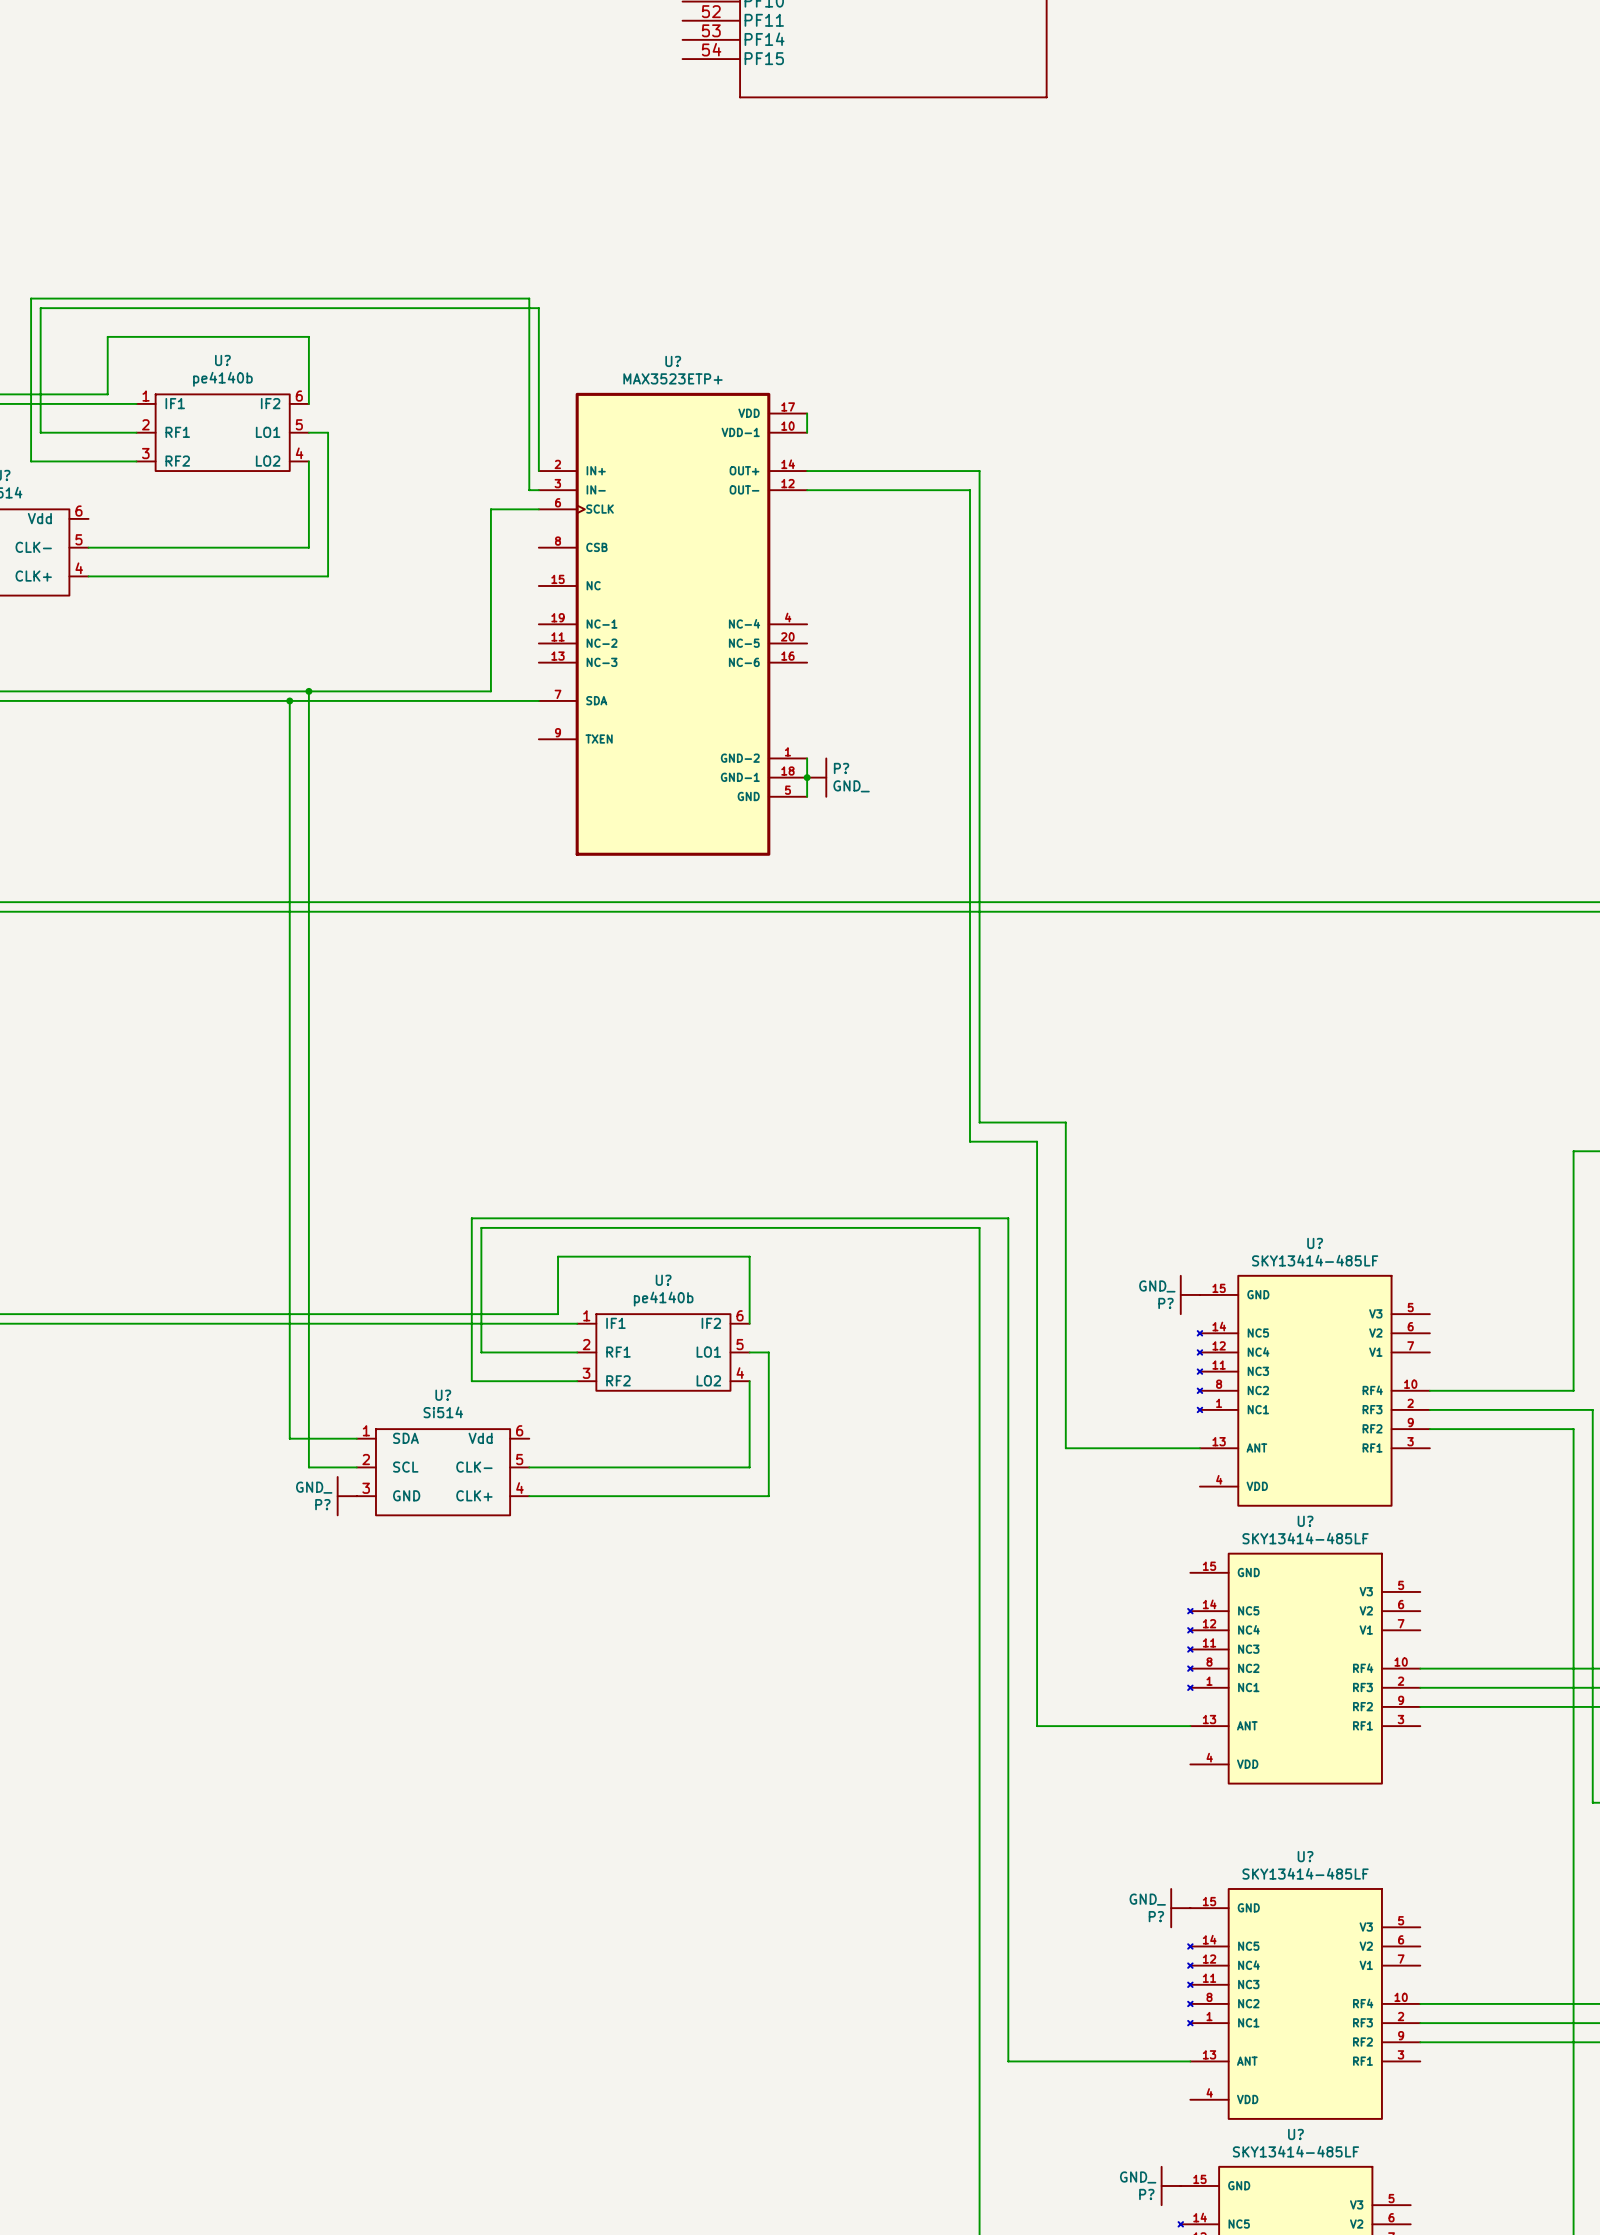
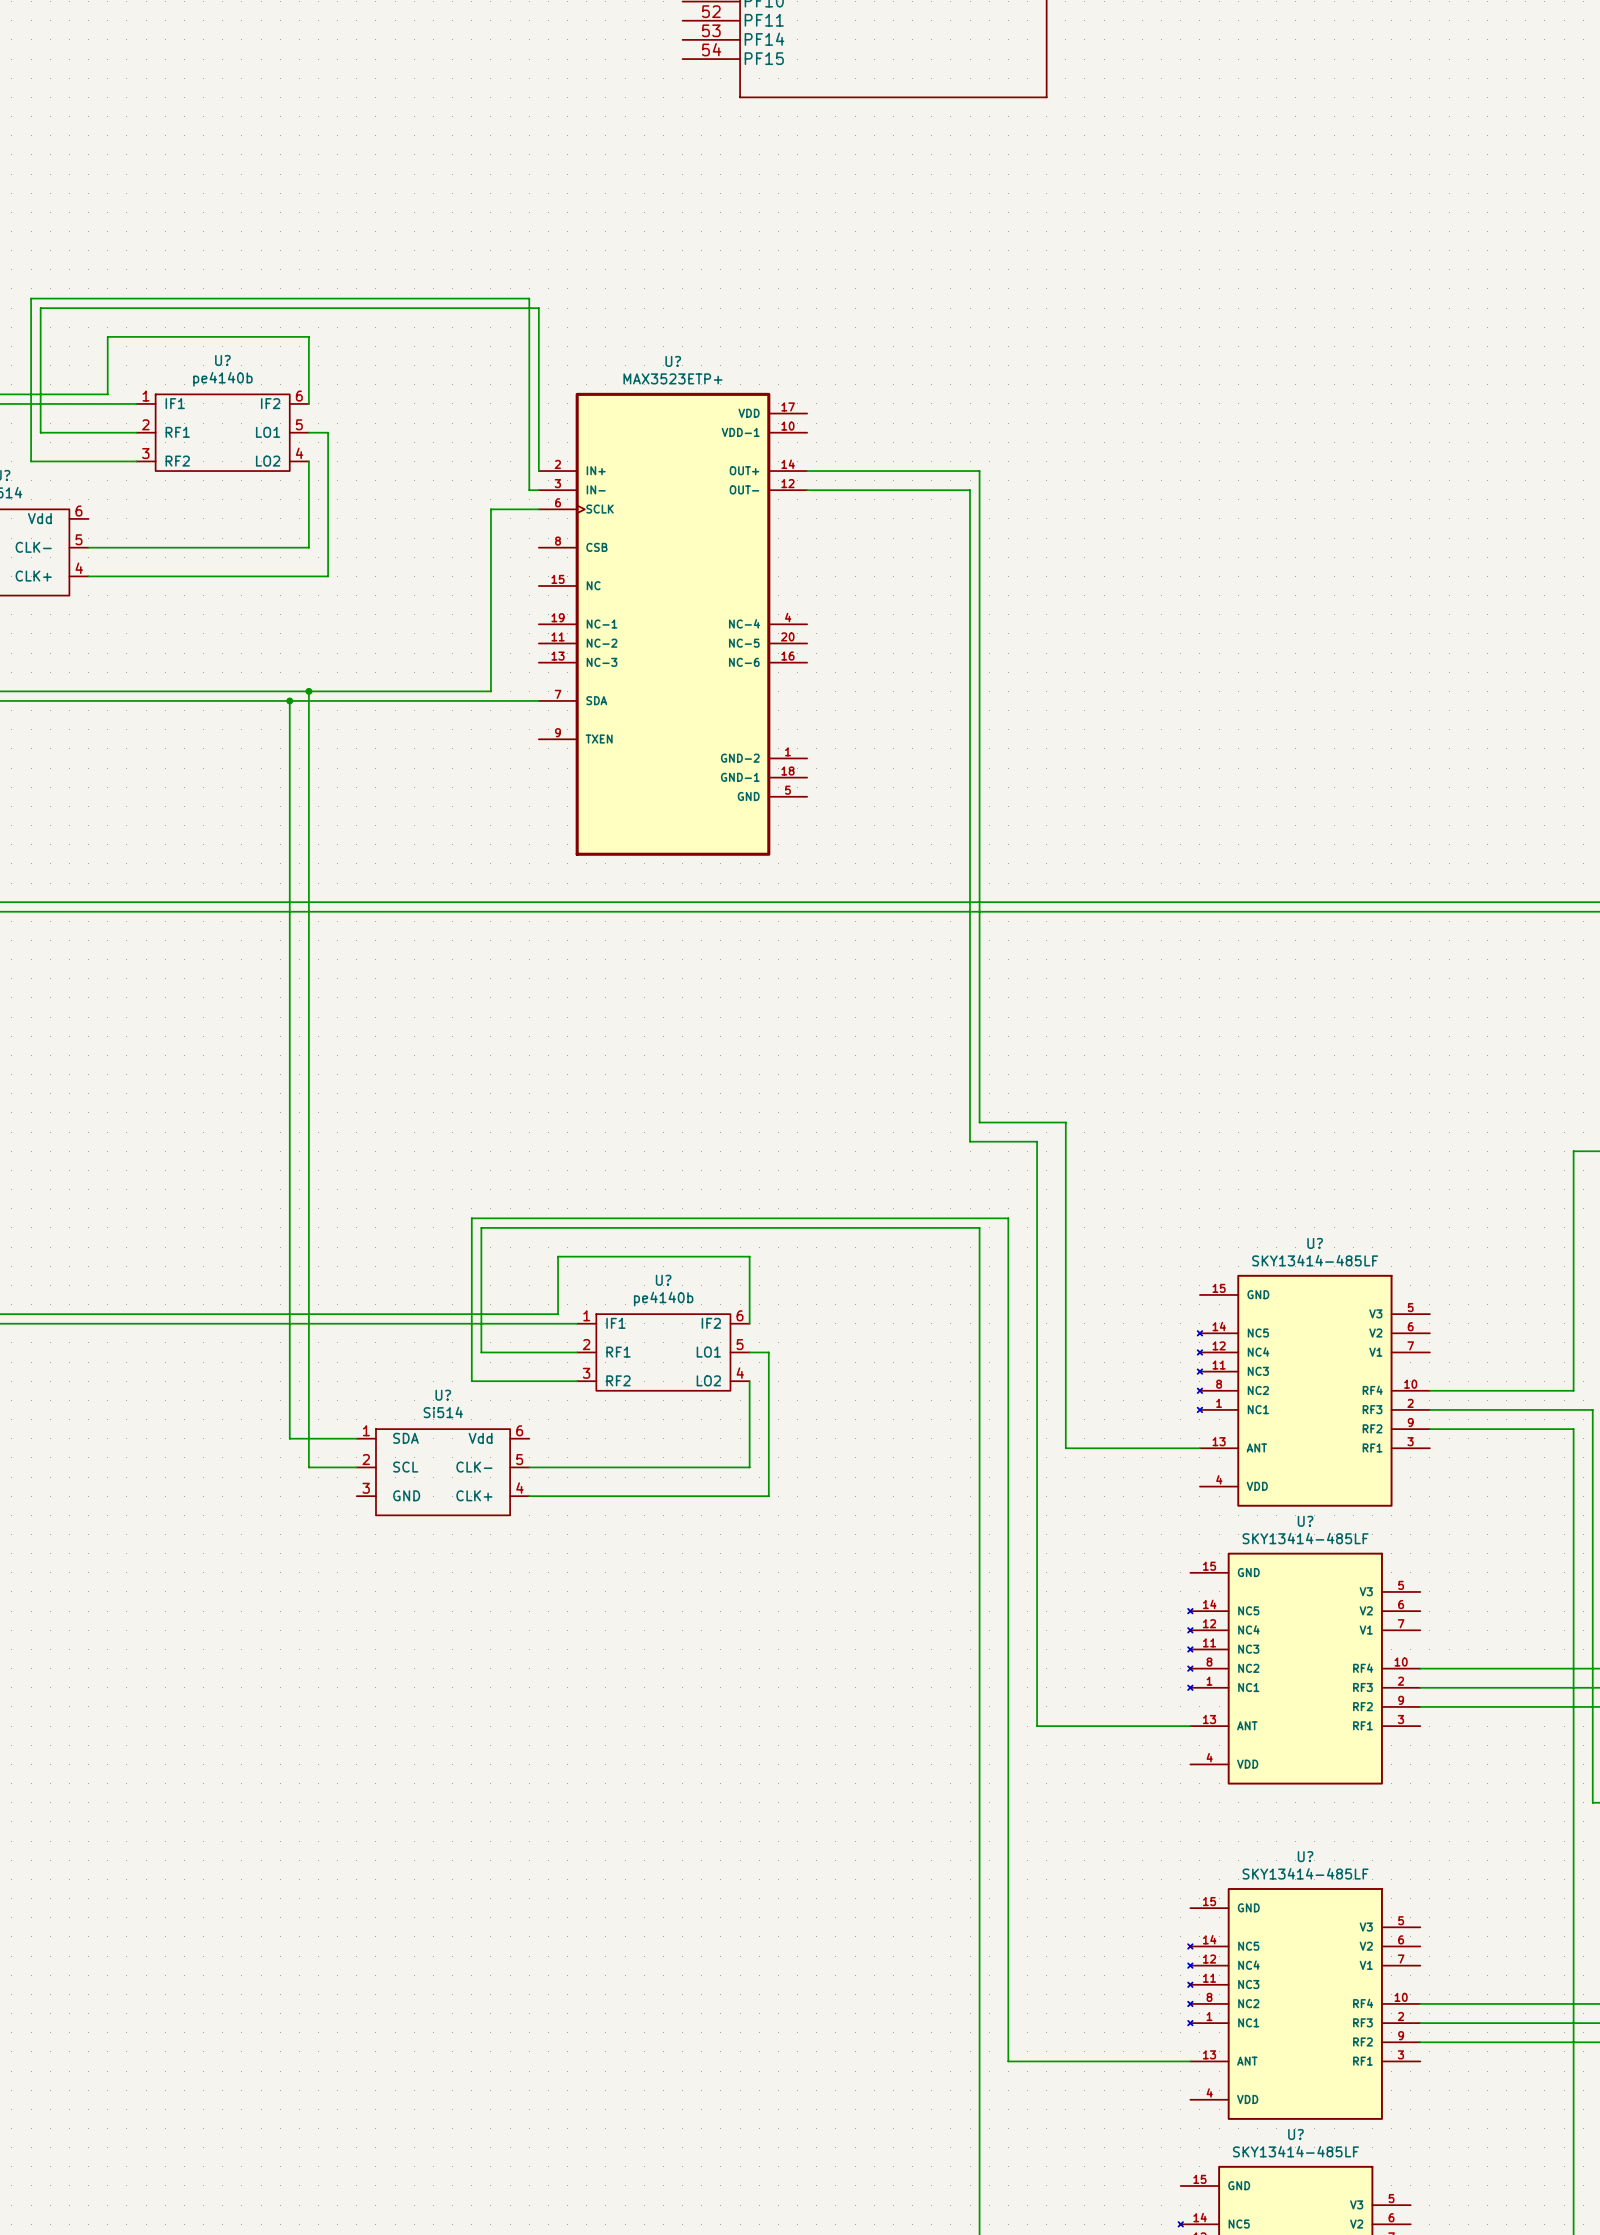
wire: (807, 413) (807, 432) -> none
wire: (807, 758) (807, 796) -> none
junction: (807, 777) -> none
P?: GND_ (816, 777) -> none
P?: GND_ (1190, 1294) -> none
P?: GND_ (347, 1496) -> none
P?: GND_ (1180, 1908) -> none
P?: GND_ (1171, 2185) -> none

